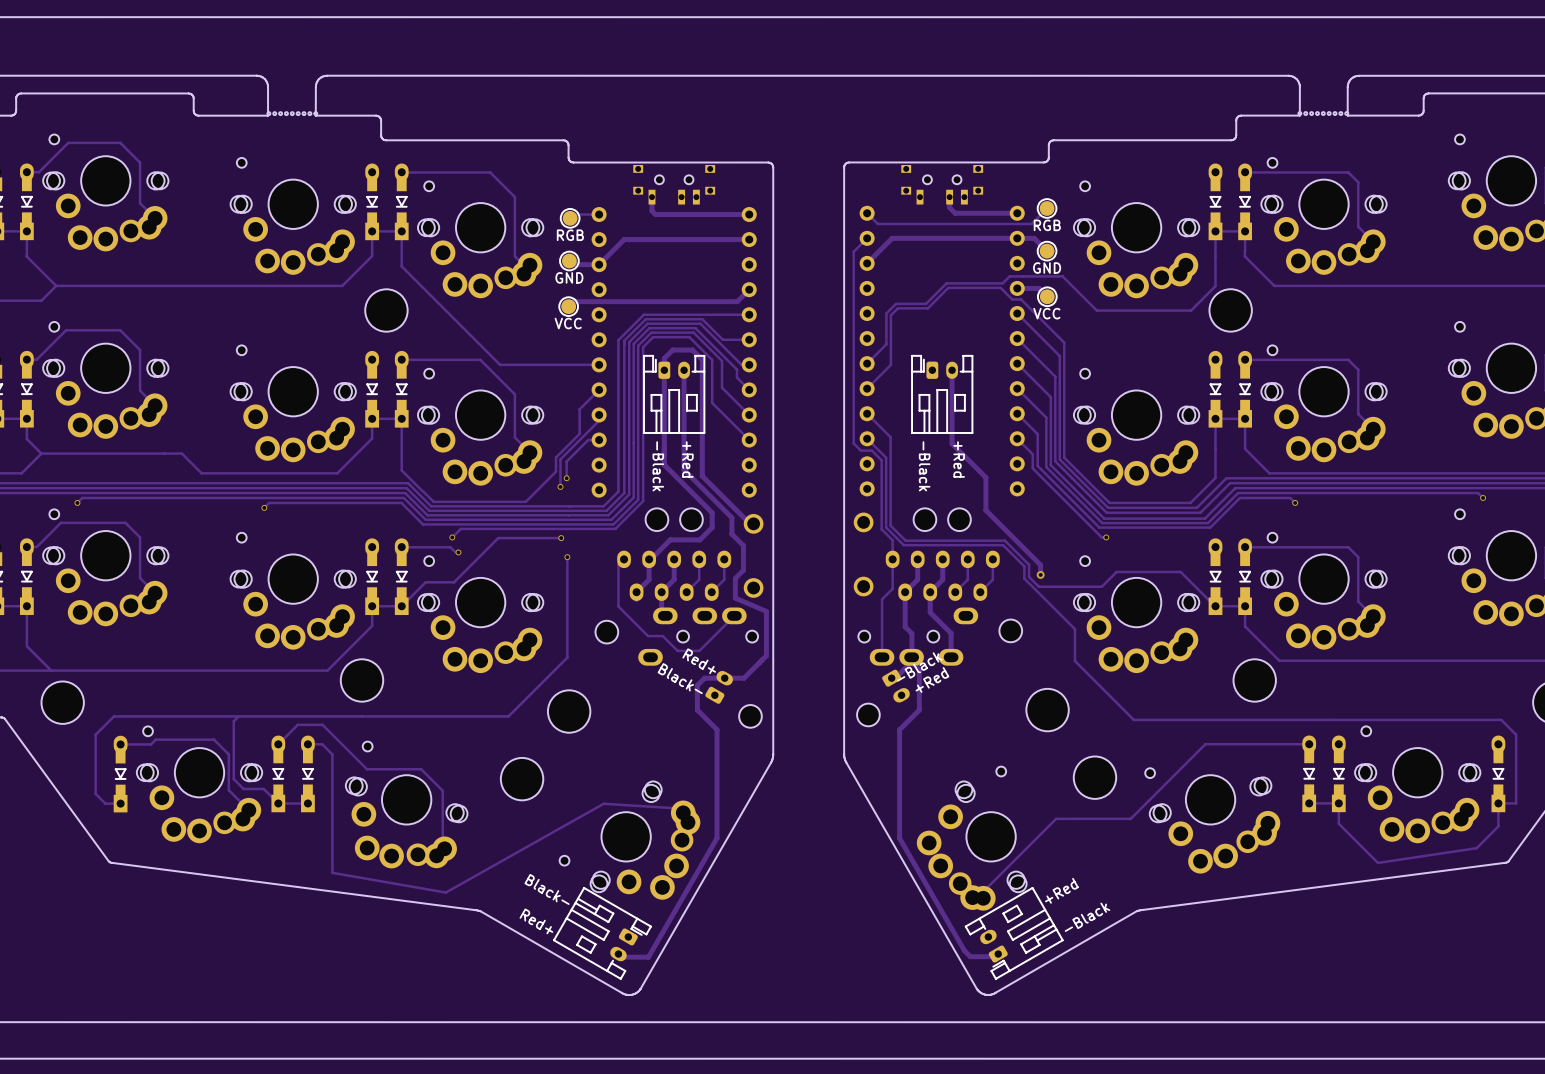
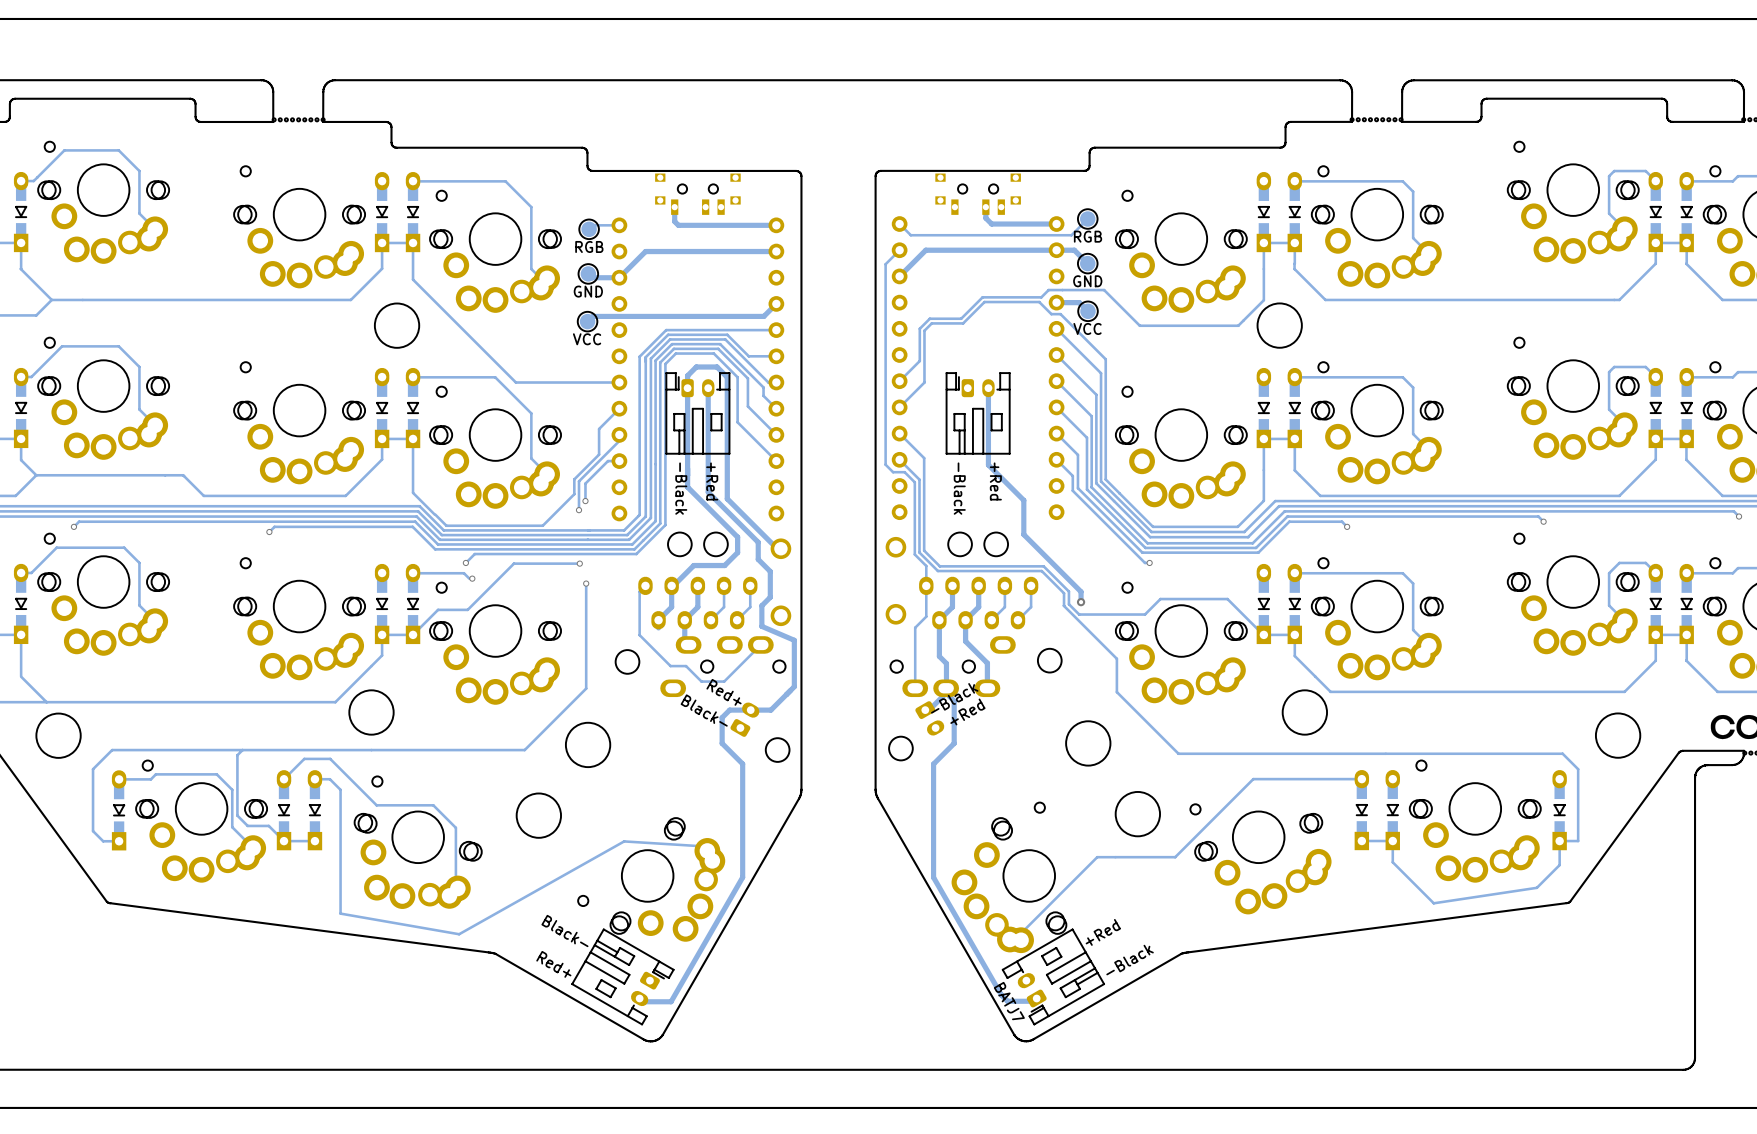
BATJ7 name: none -> BATJ7 (1009, 1001)

